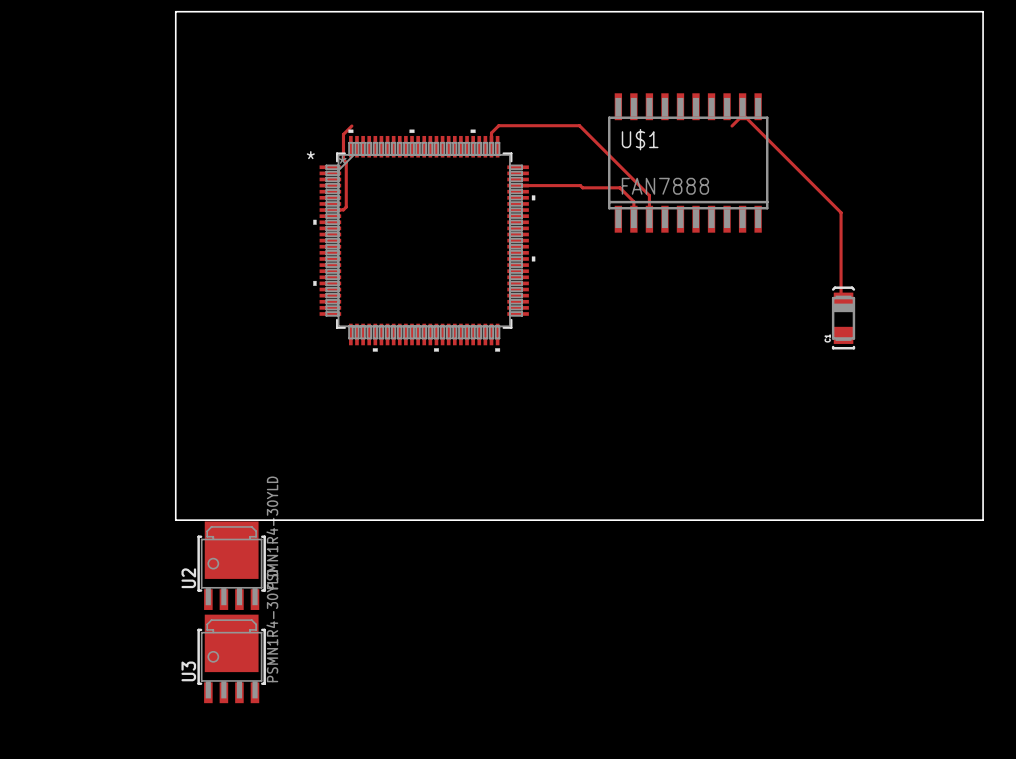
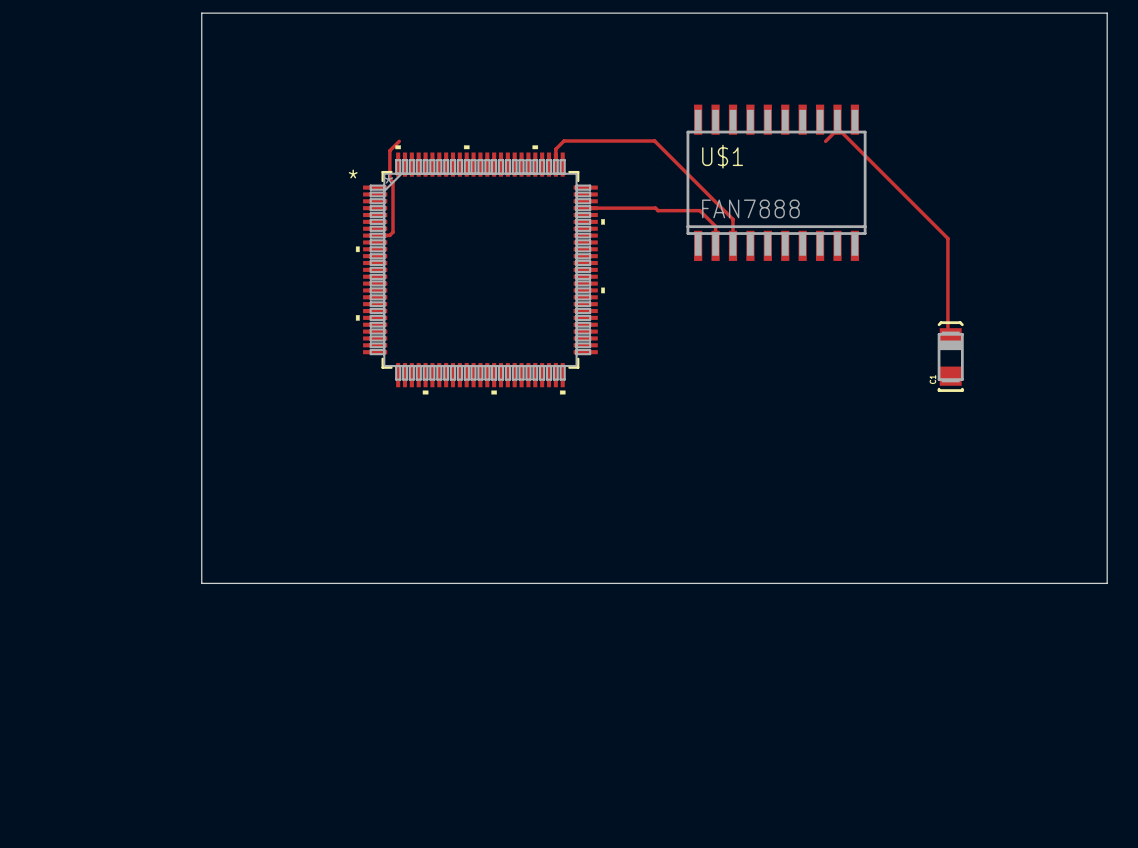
U2: PSMN1R4-30YLD (231, 565) -> none
U3: PSMN1R4-30YLD (231, 658) -> none

